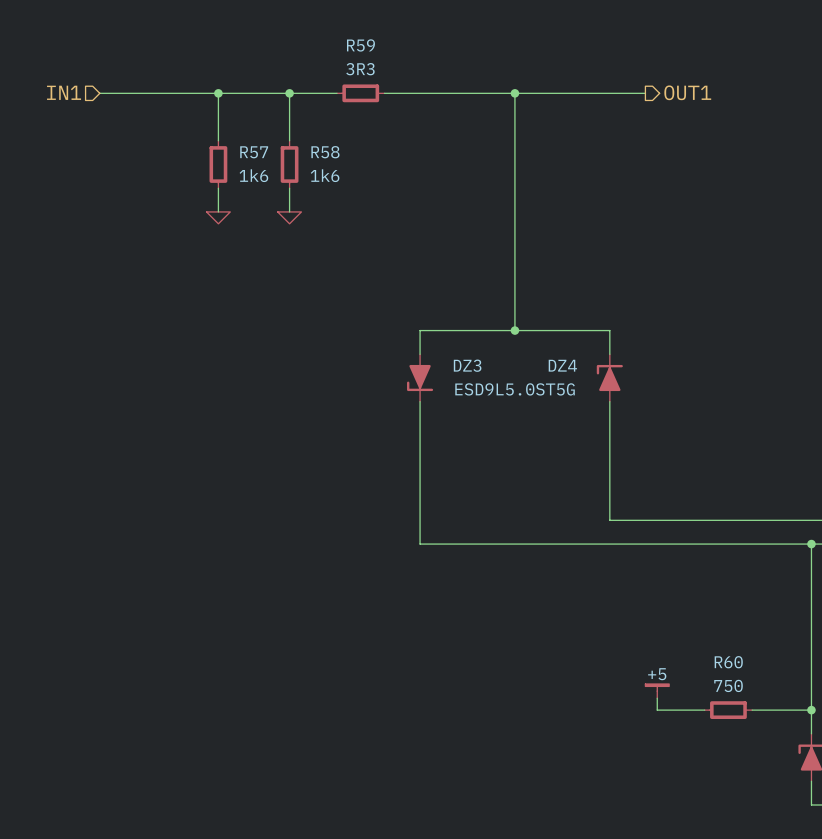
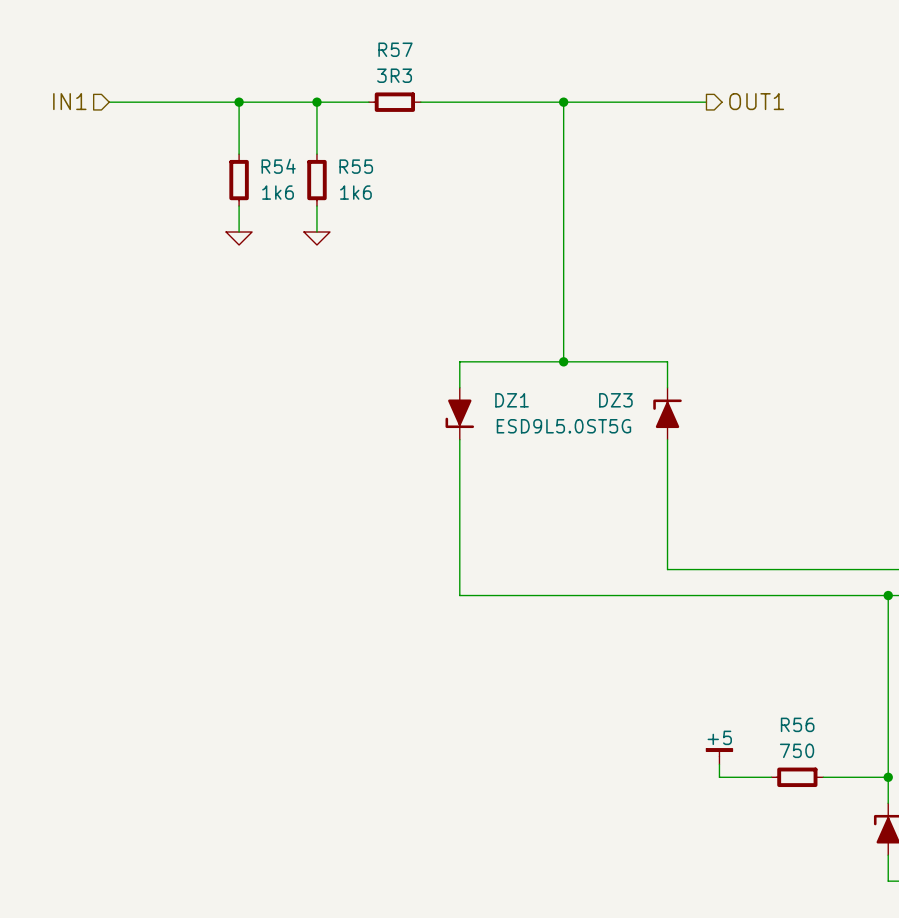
R59 name: R59 (360, 45) -> R57 (395, 49)
R57 name: R57 (254, 152) -> R54 (278, 166)
R58 name: R58 (325, 152) -> R55 (356, 166)
DZ3 name: DZ3 (467, 365) -> DZ1 (512, 400)
DZ4 name: DZ4 (562, 365) -> DZ3 (615, 400)
R60 name: R60 (728, 662) -> R56 (797, 724)

